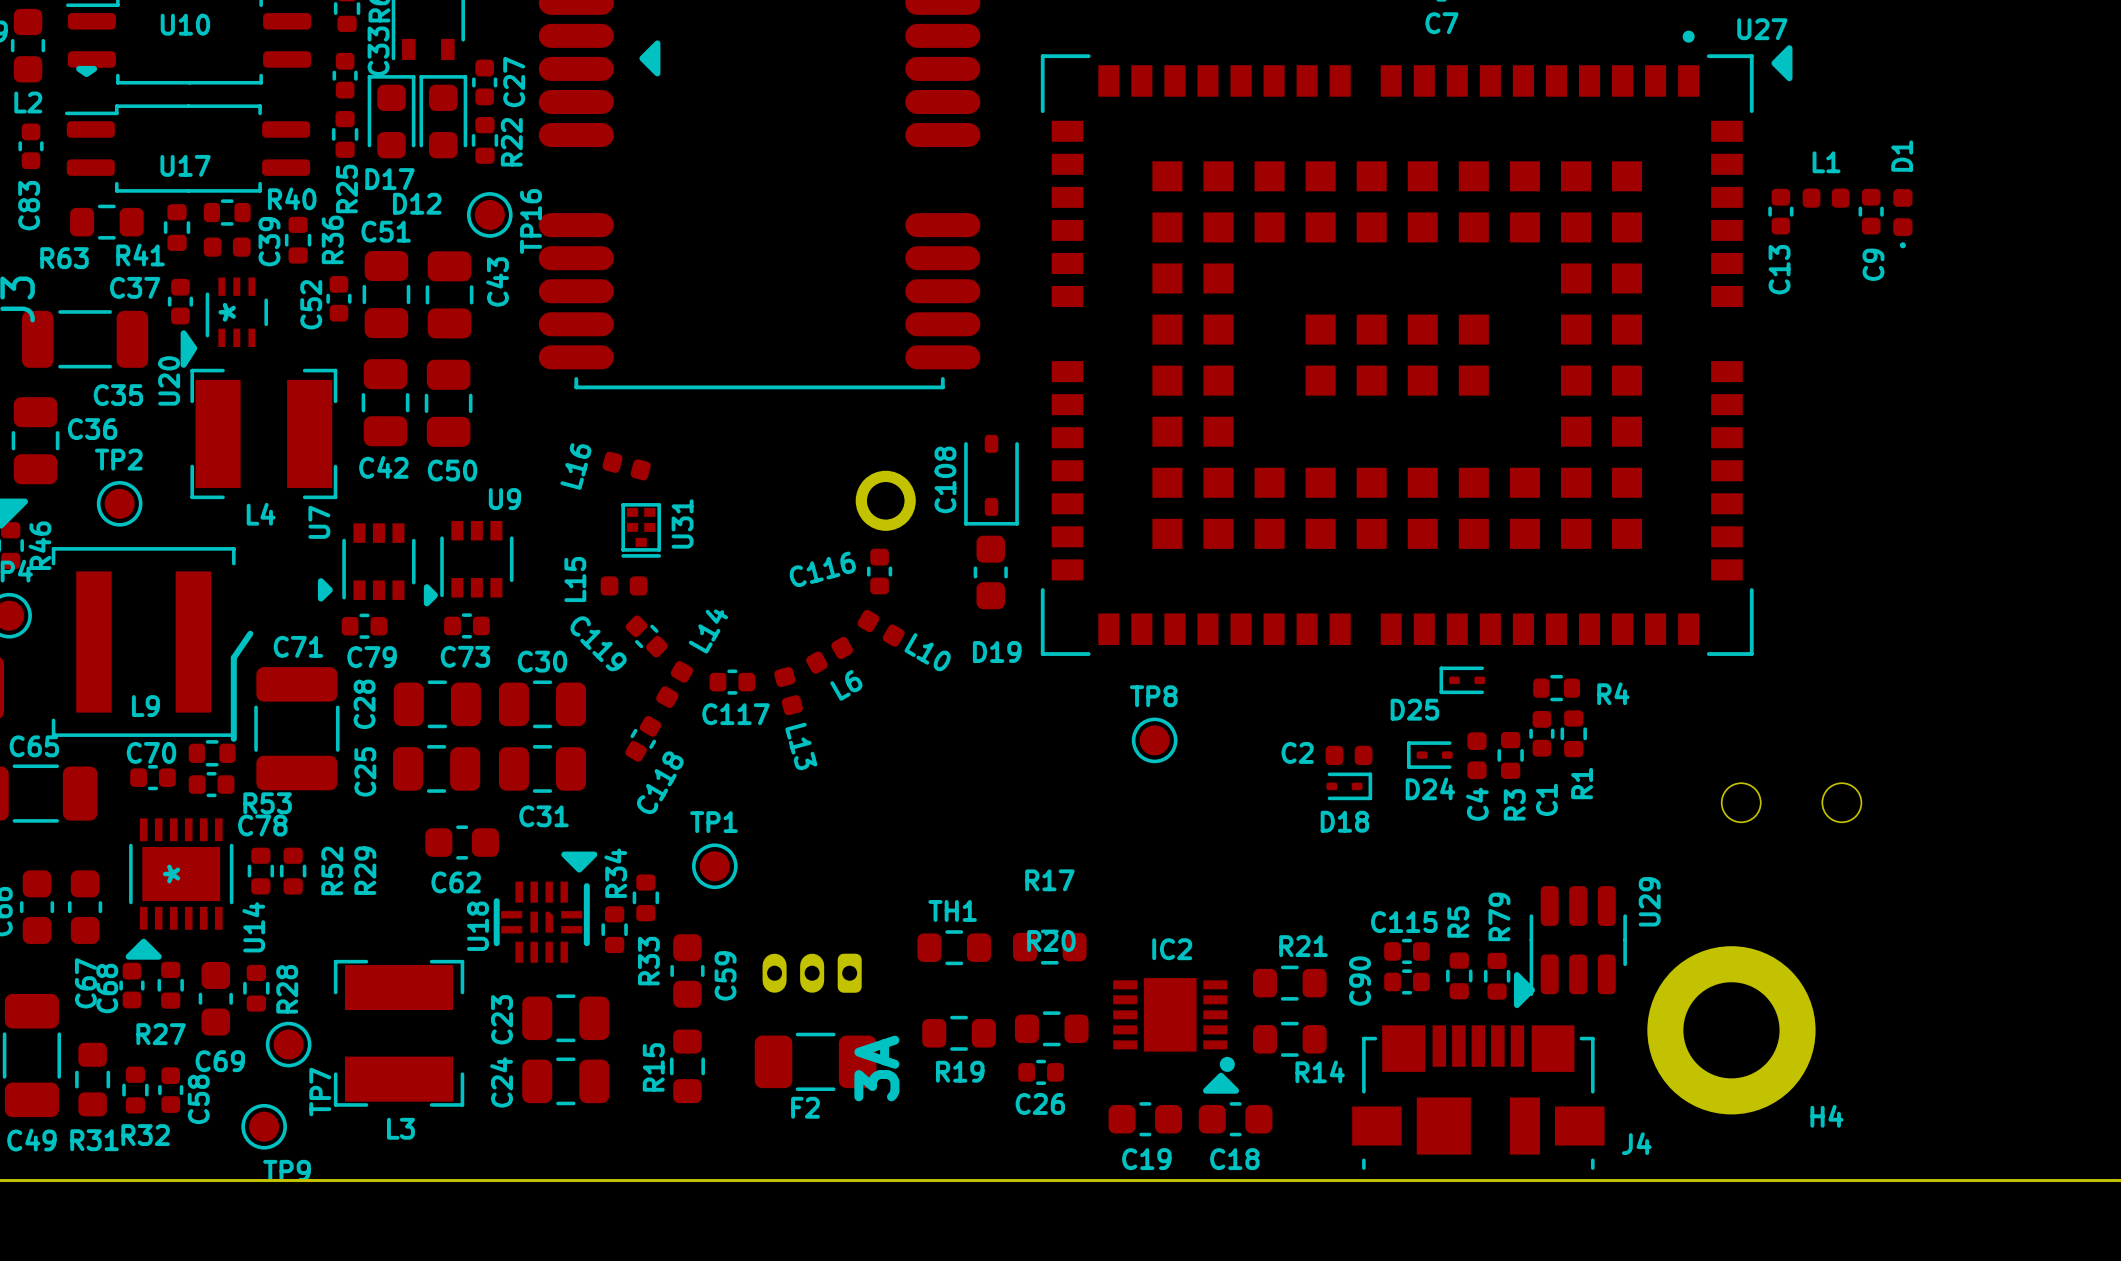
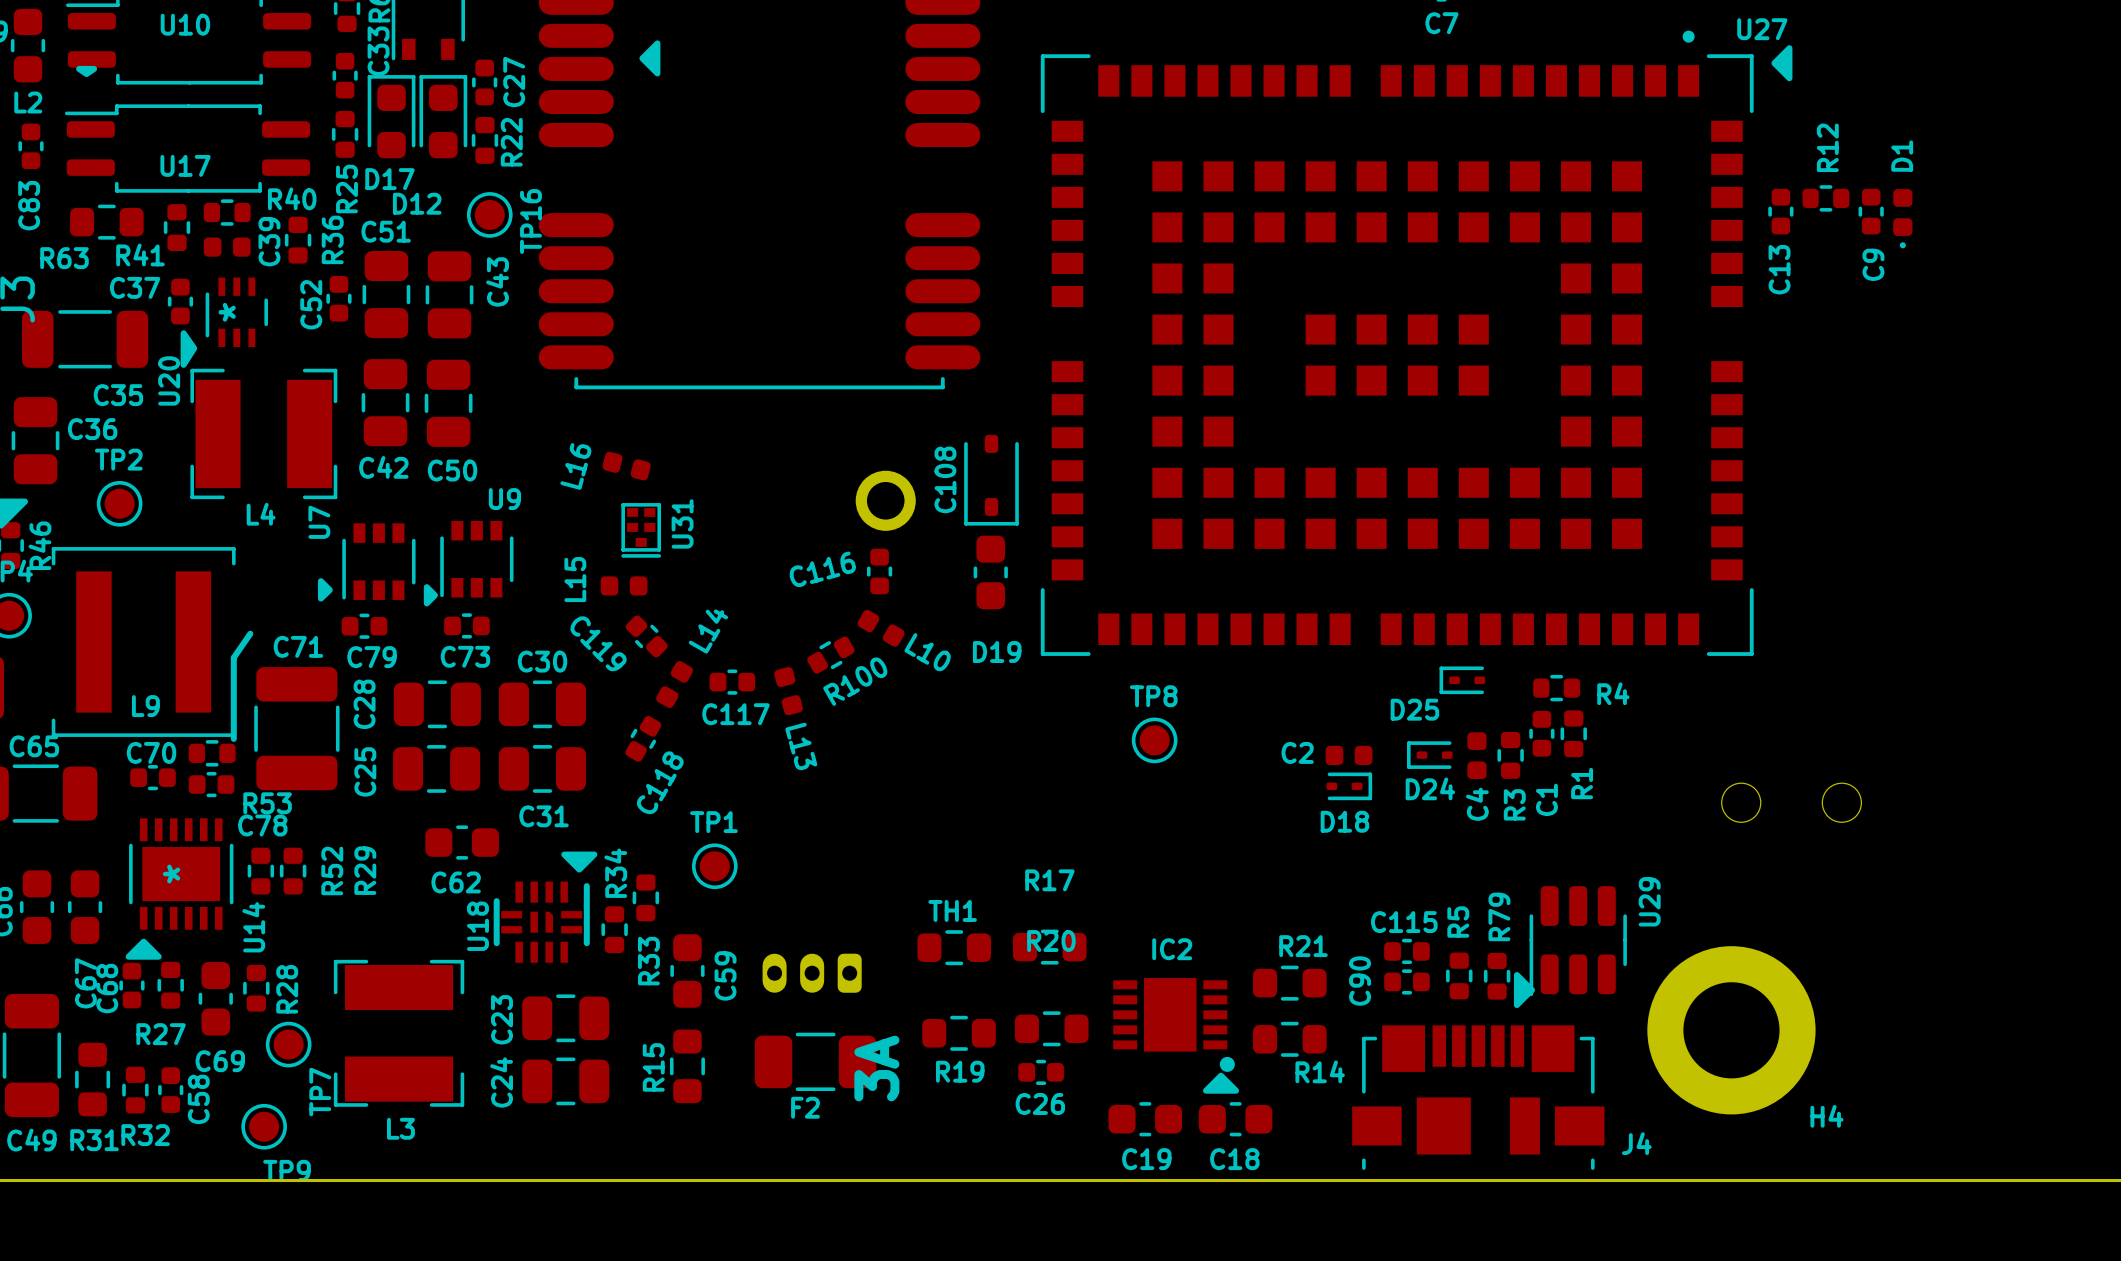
R12: none -> (1825, 198)
L1: (1826, 198) -> none
L6: (829, 655) -> none
R100: none -> (830, 655)

